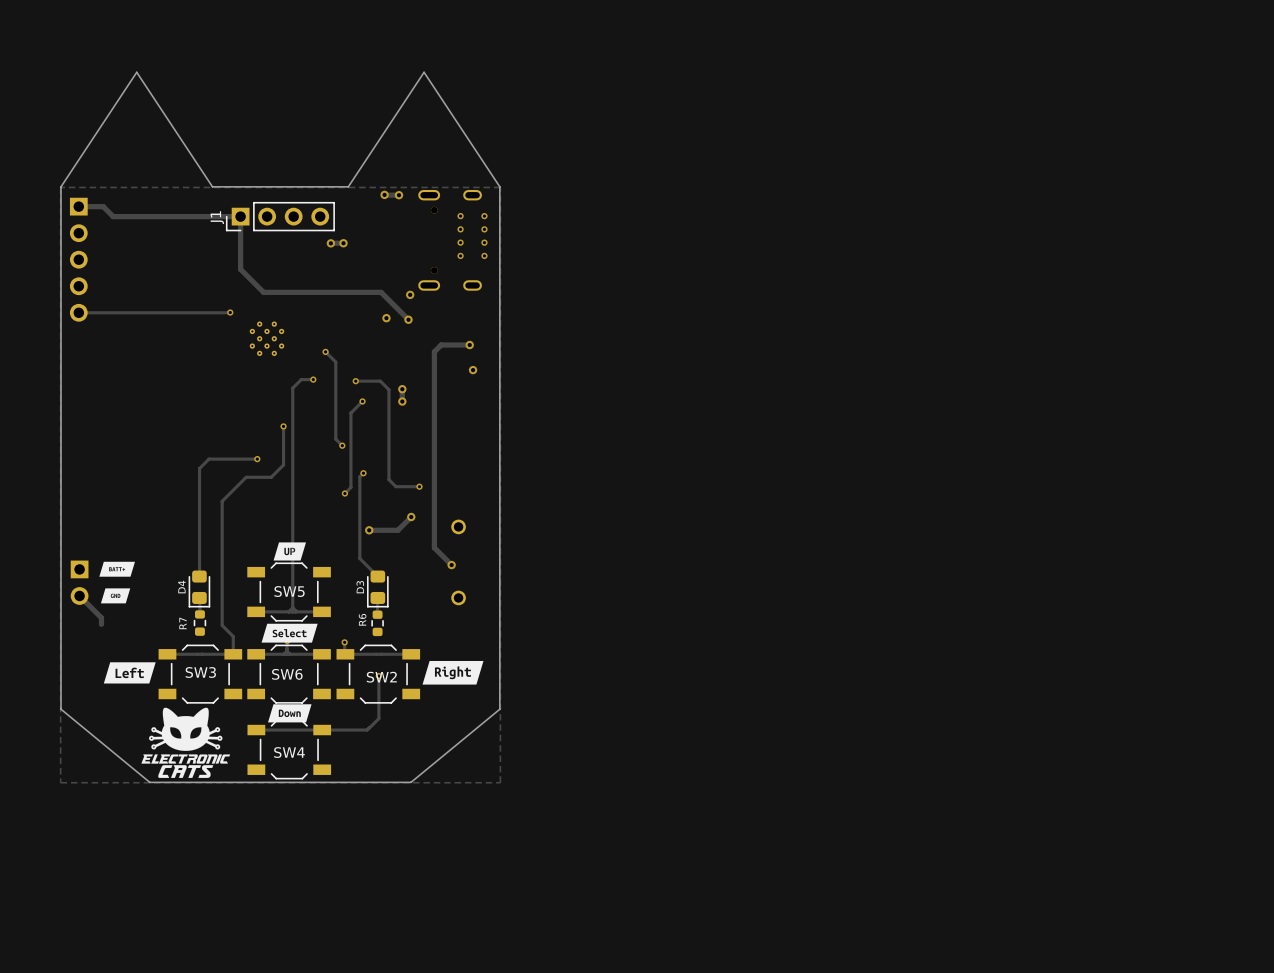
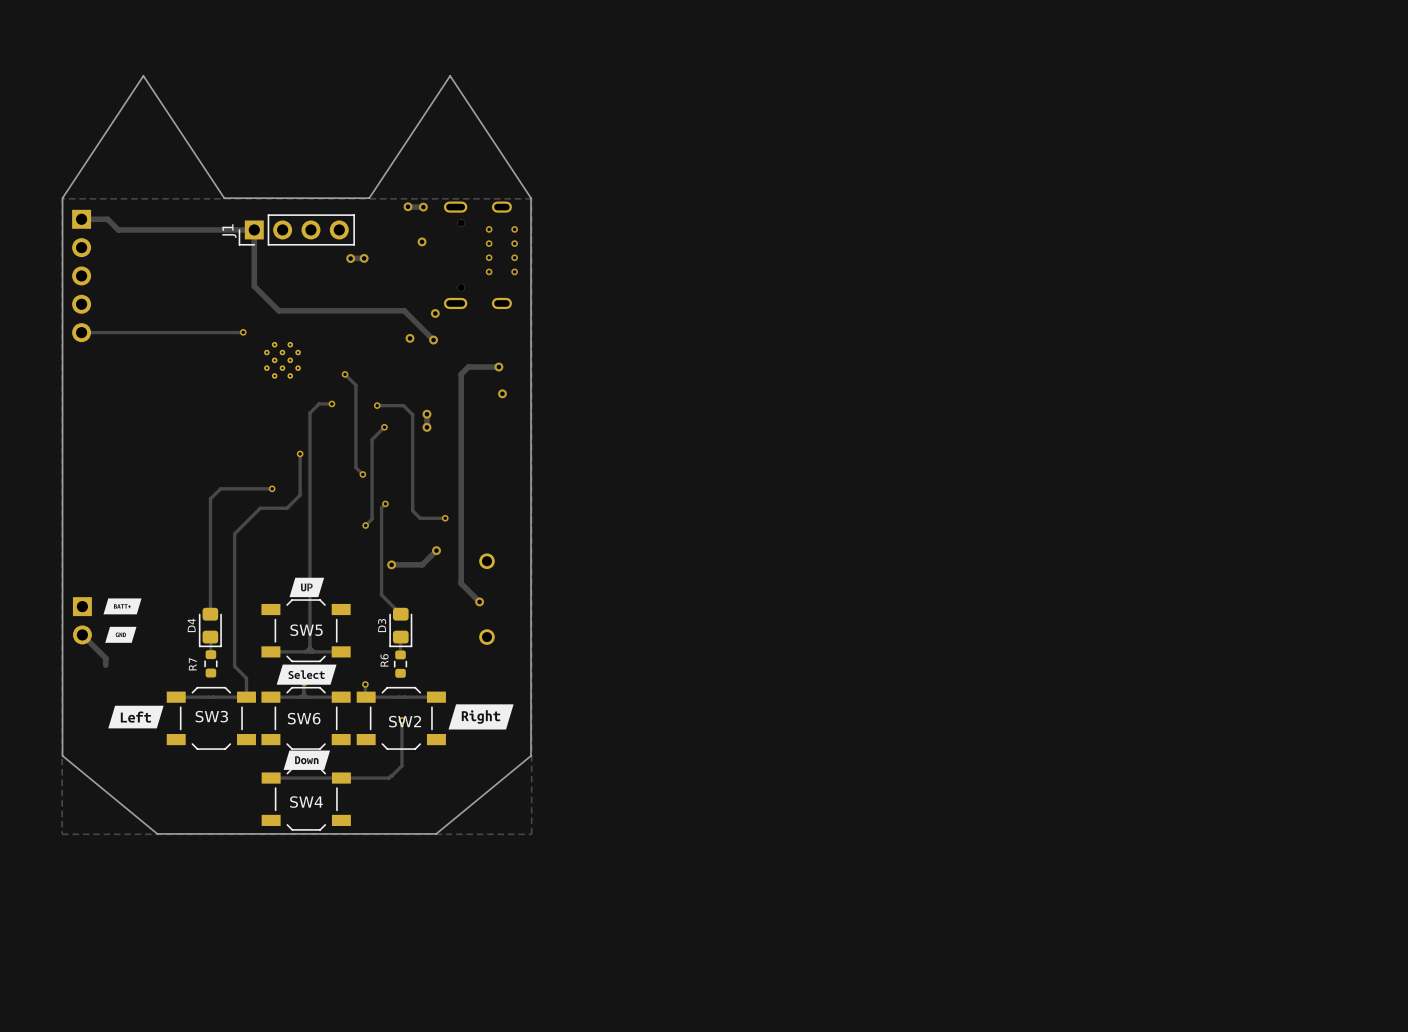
via: none -> (422, 241)
drawing: [141, 707, 231, 778] -> none

